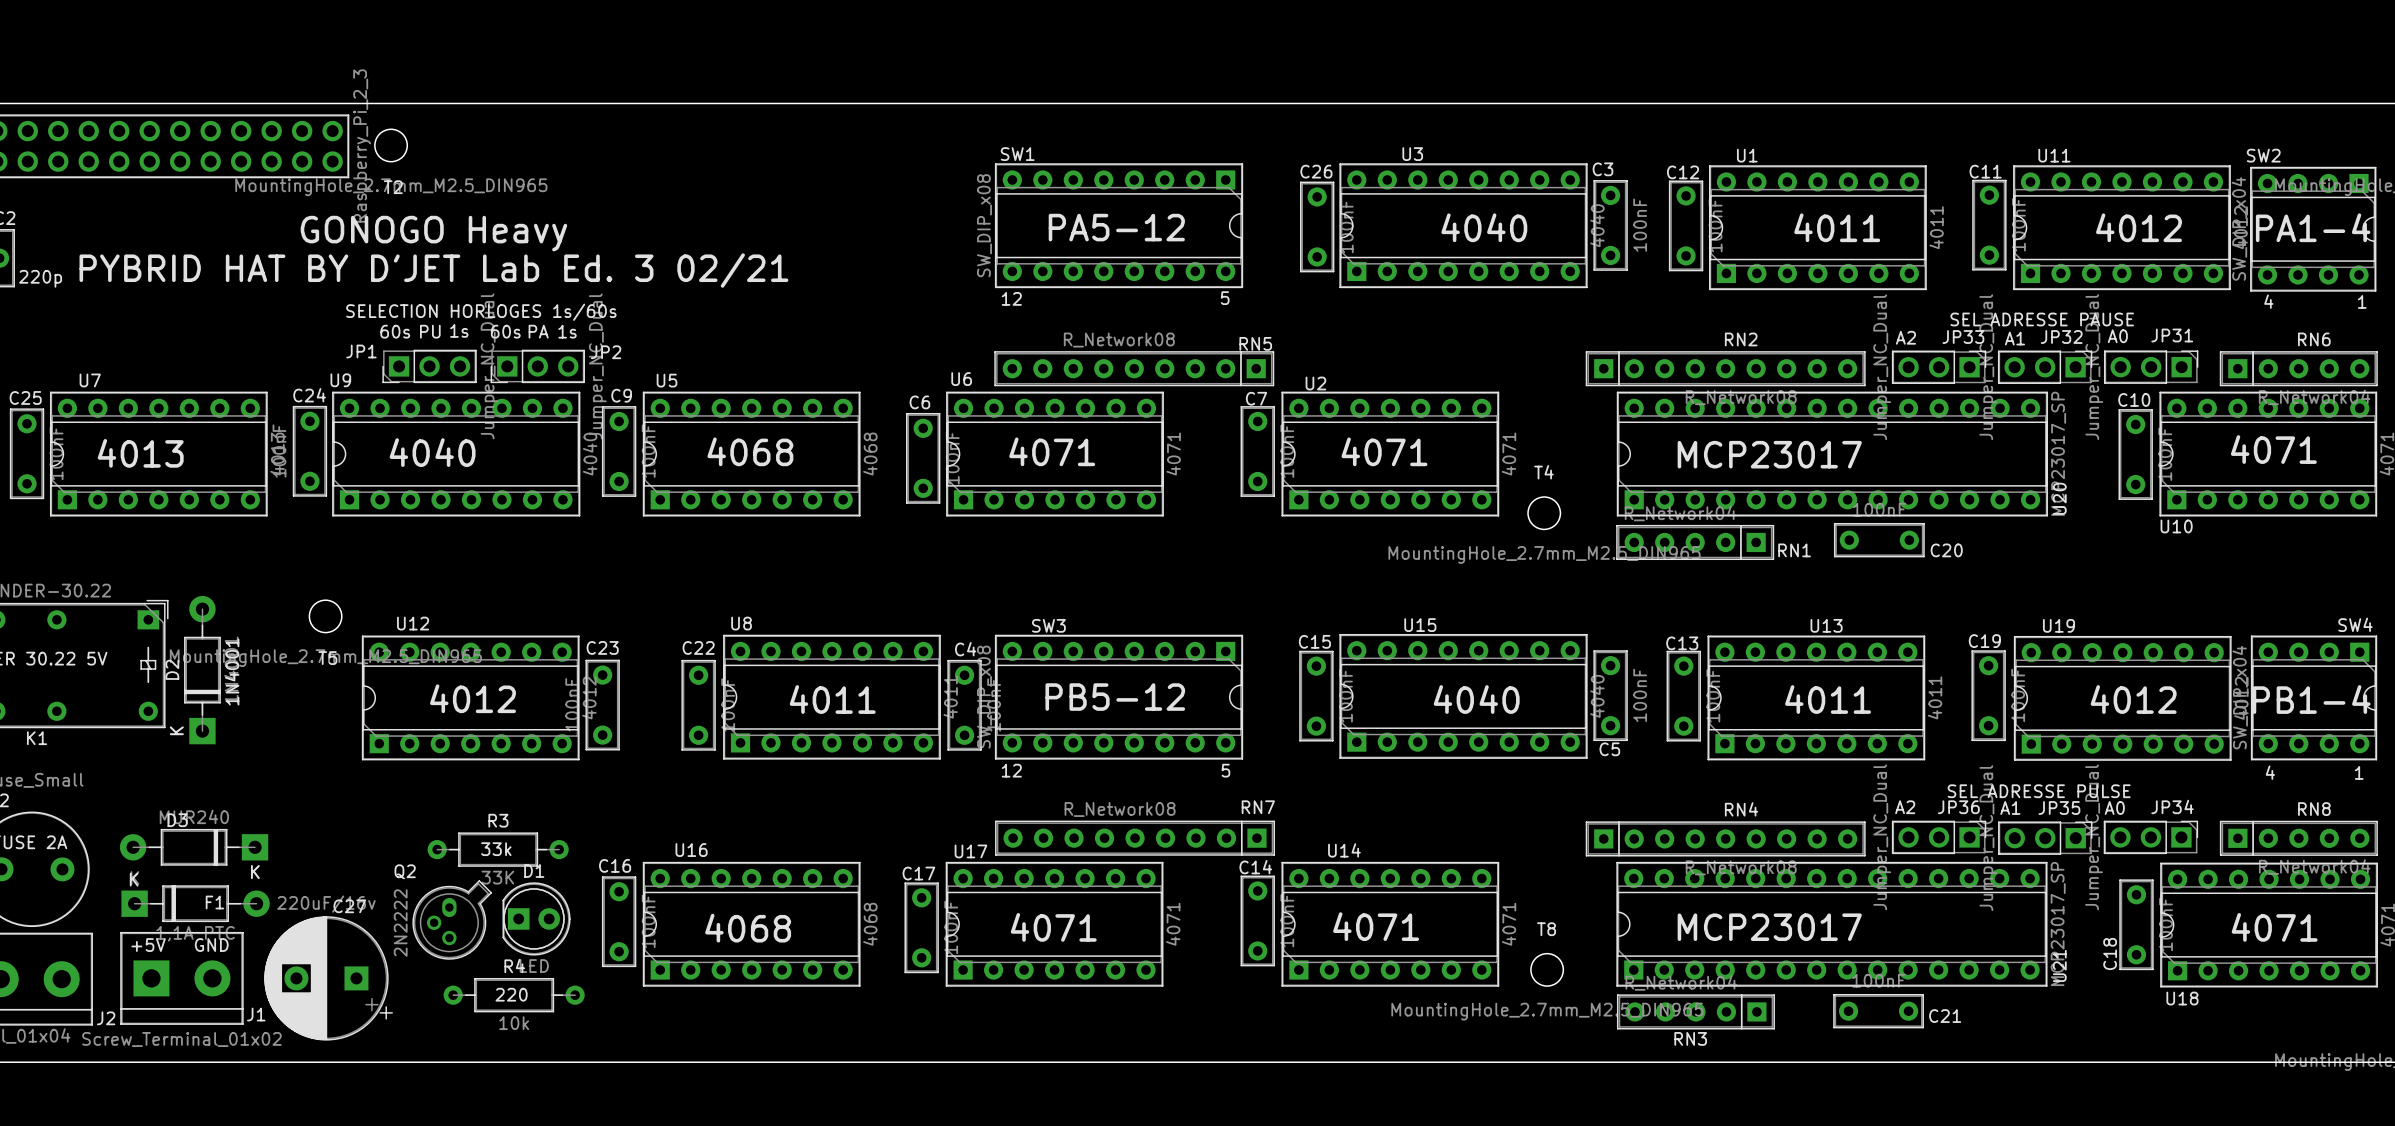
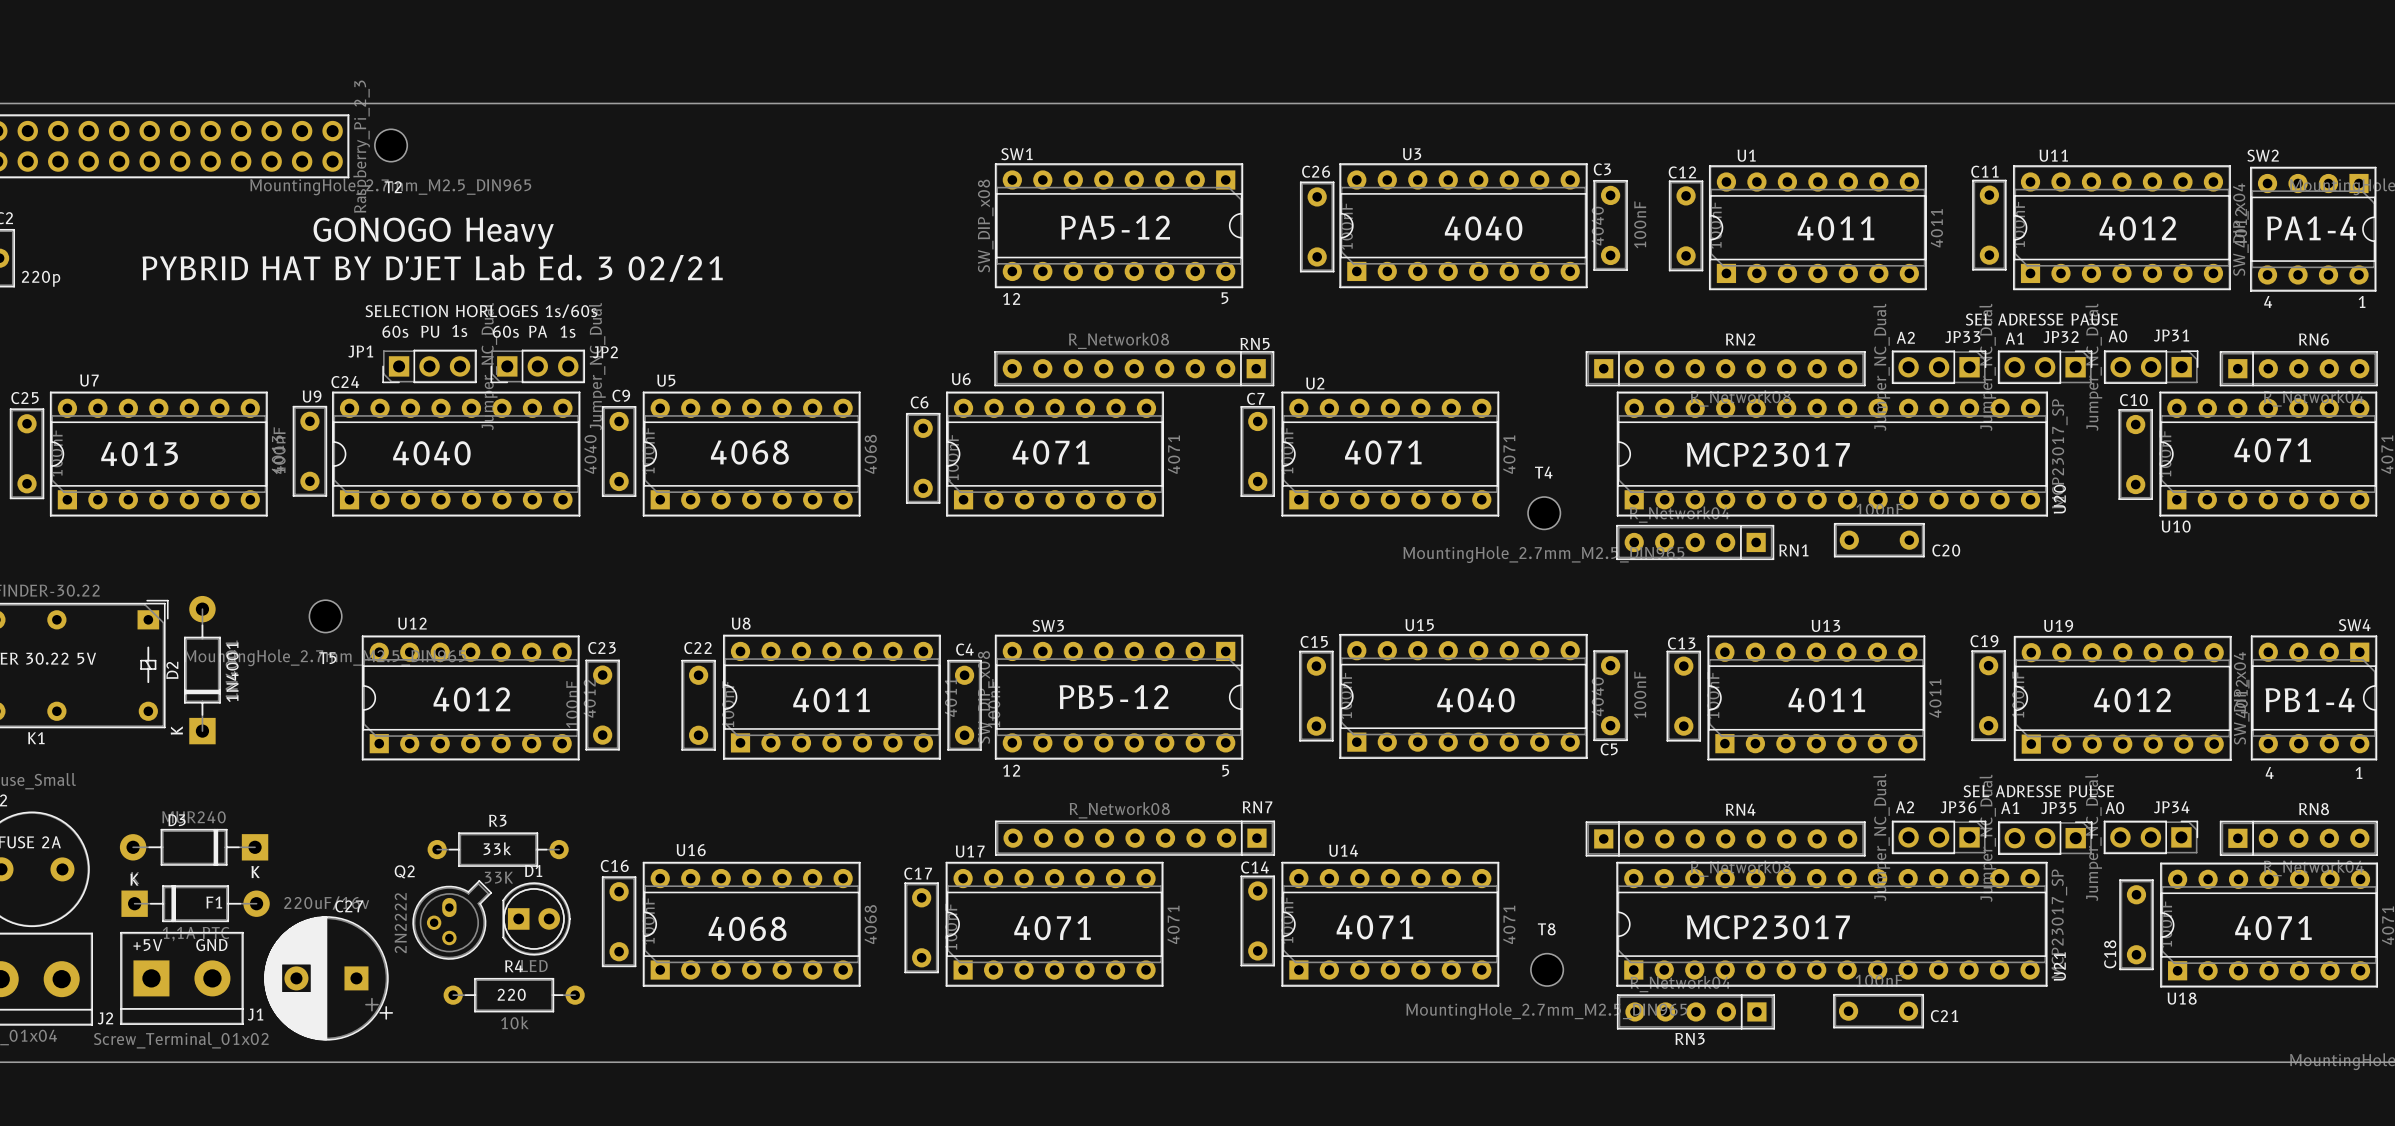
U9 name position: U9 (340, 380) -> U9 (312, 396)
C24 name position: C24 (309, 395) -> C24 (345, 382)

